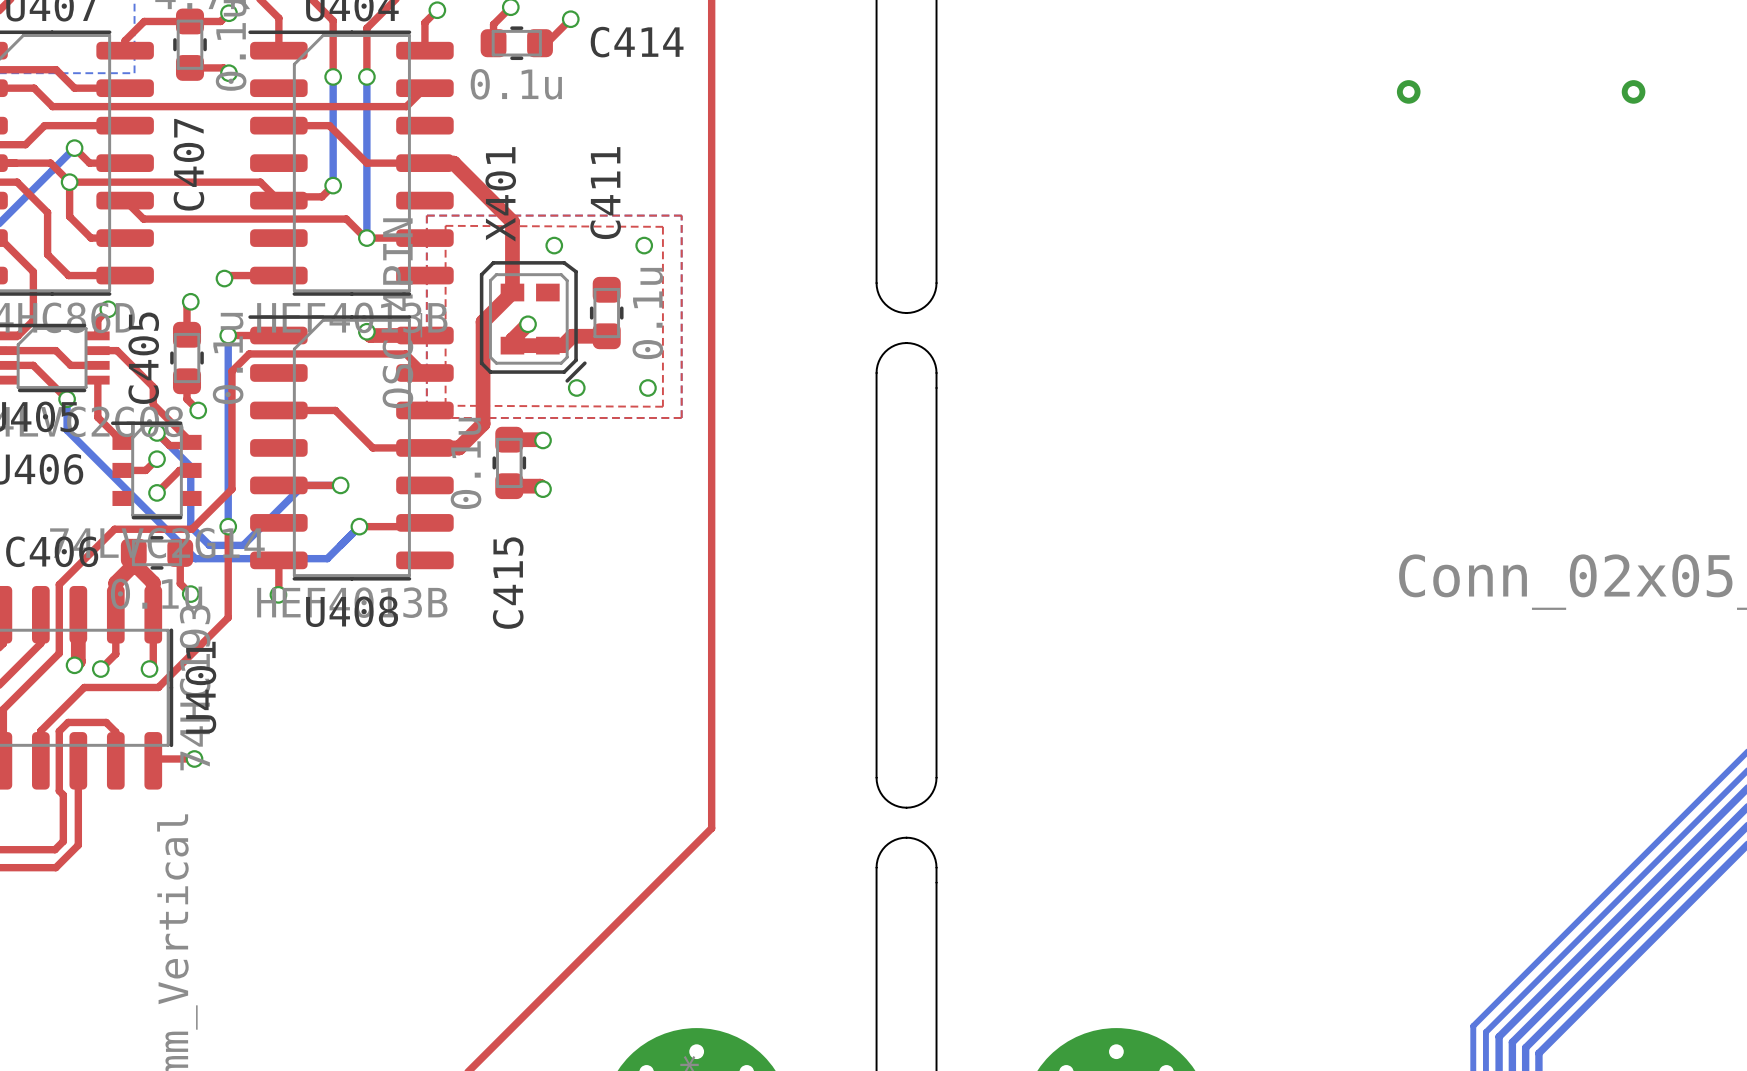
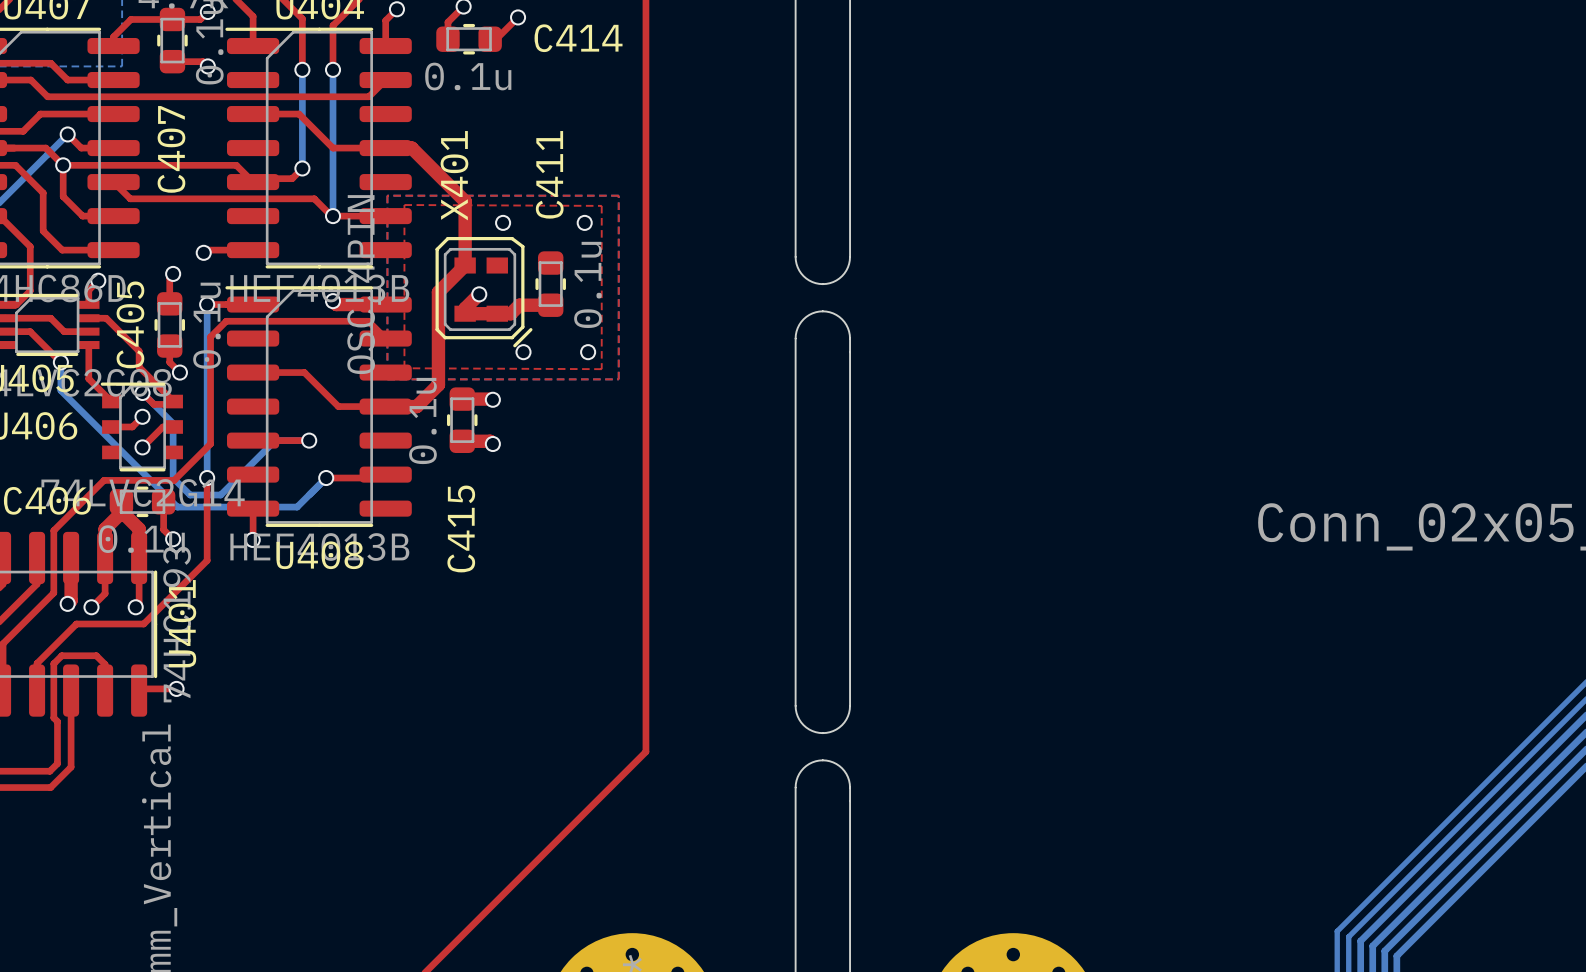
via: (1408, 91) -> none
via: (1633, 91) -> none

